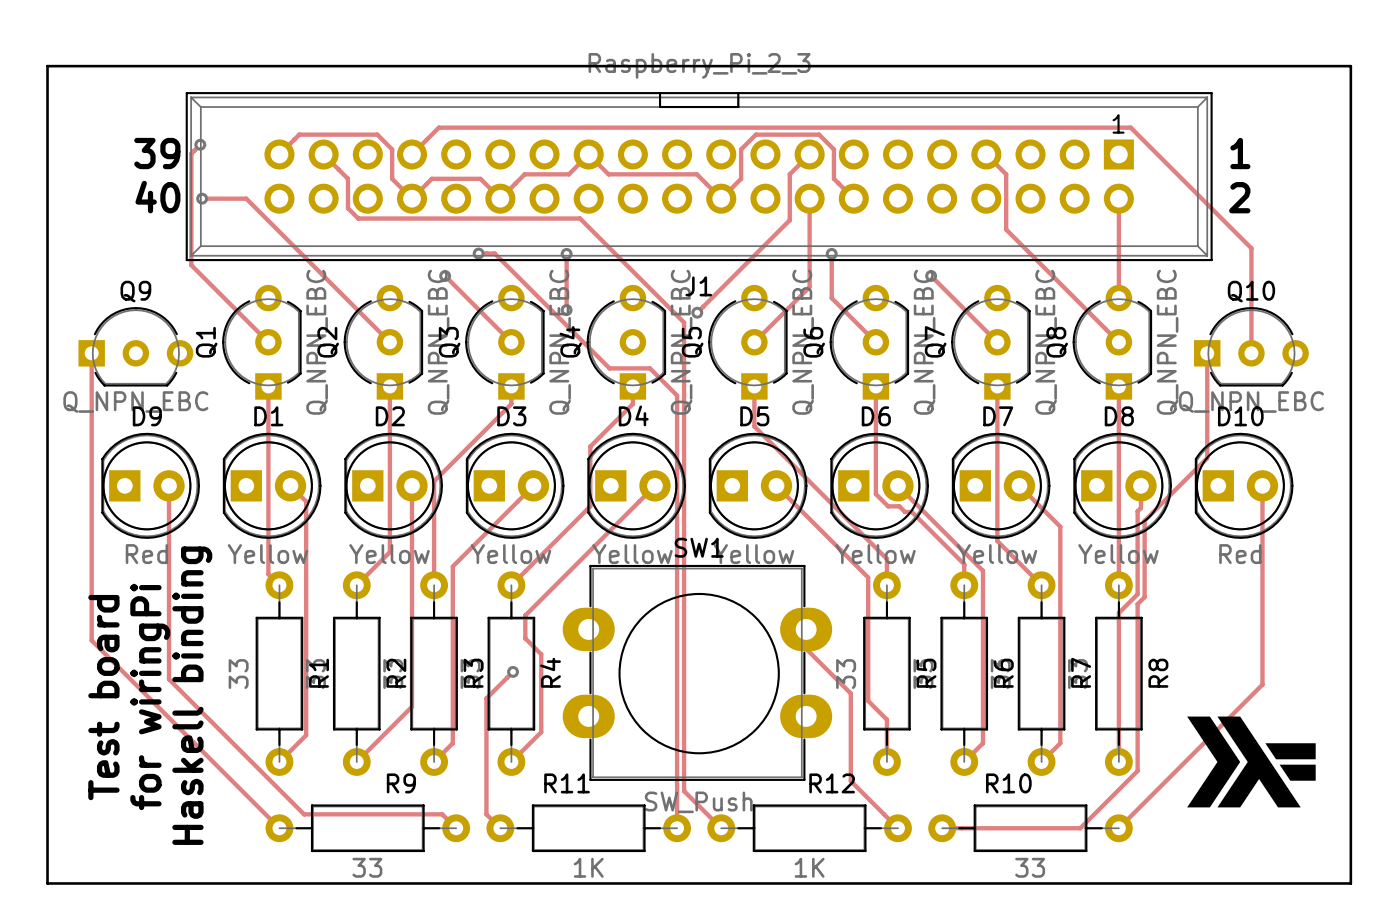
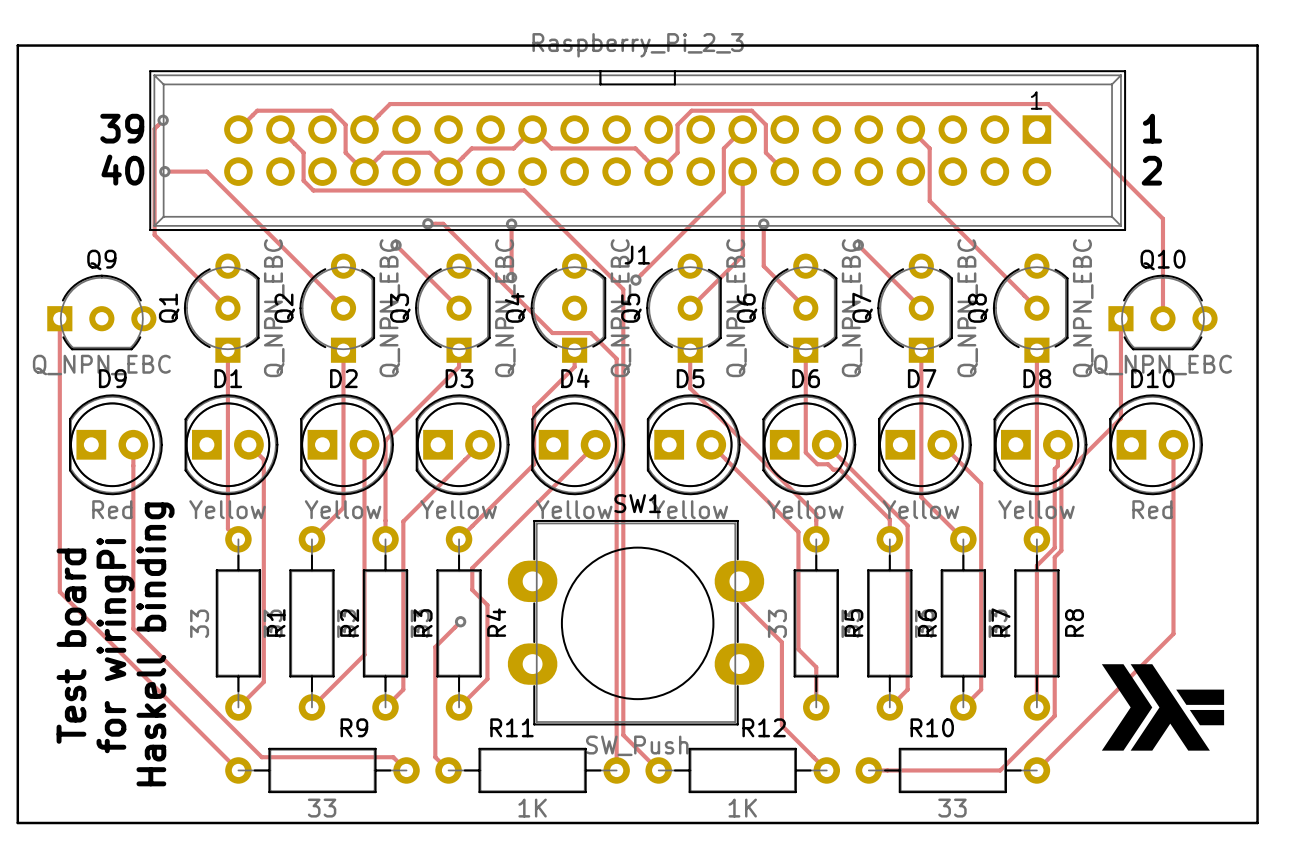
track: (1118, 198) (1118, 298) -> none

